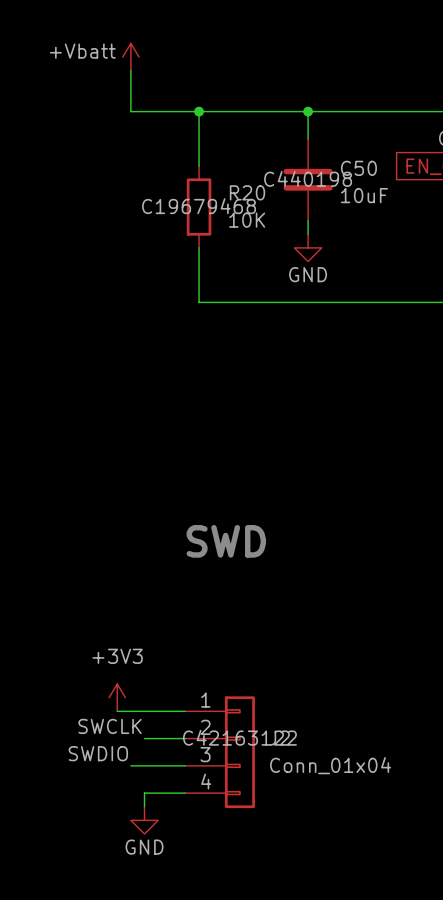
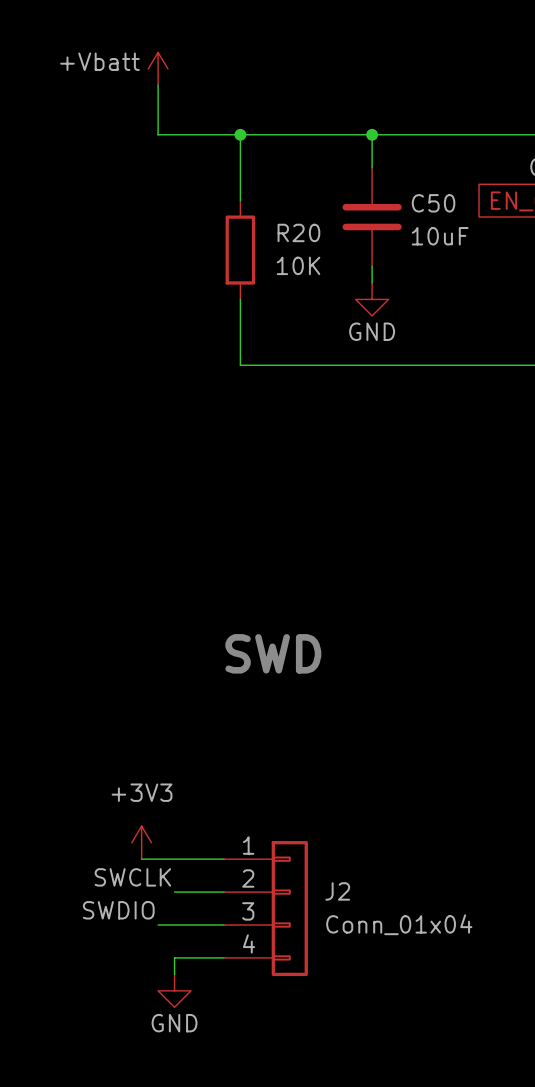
C50 text: C440198 (308, 178) -> none
R20 text: C19679468 (199, 206) -> none
J2 text: C42163122 (239, 737) -> none

